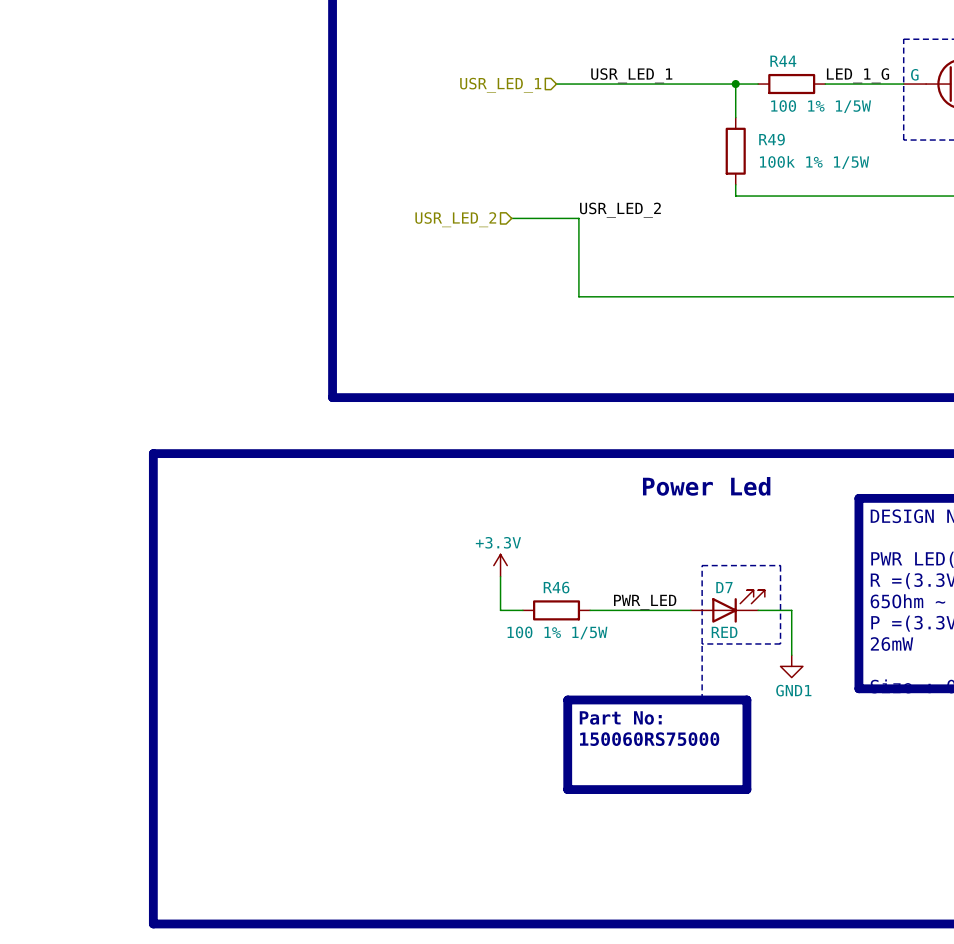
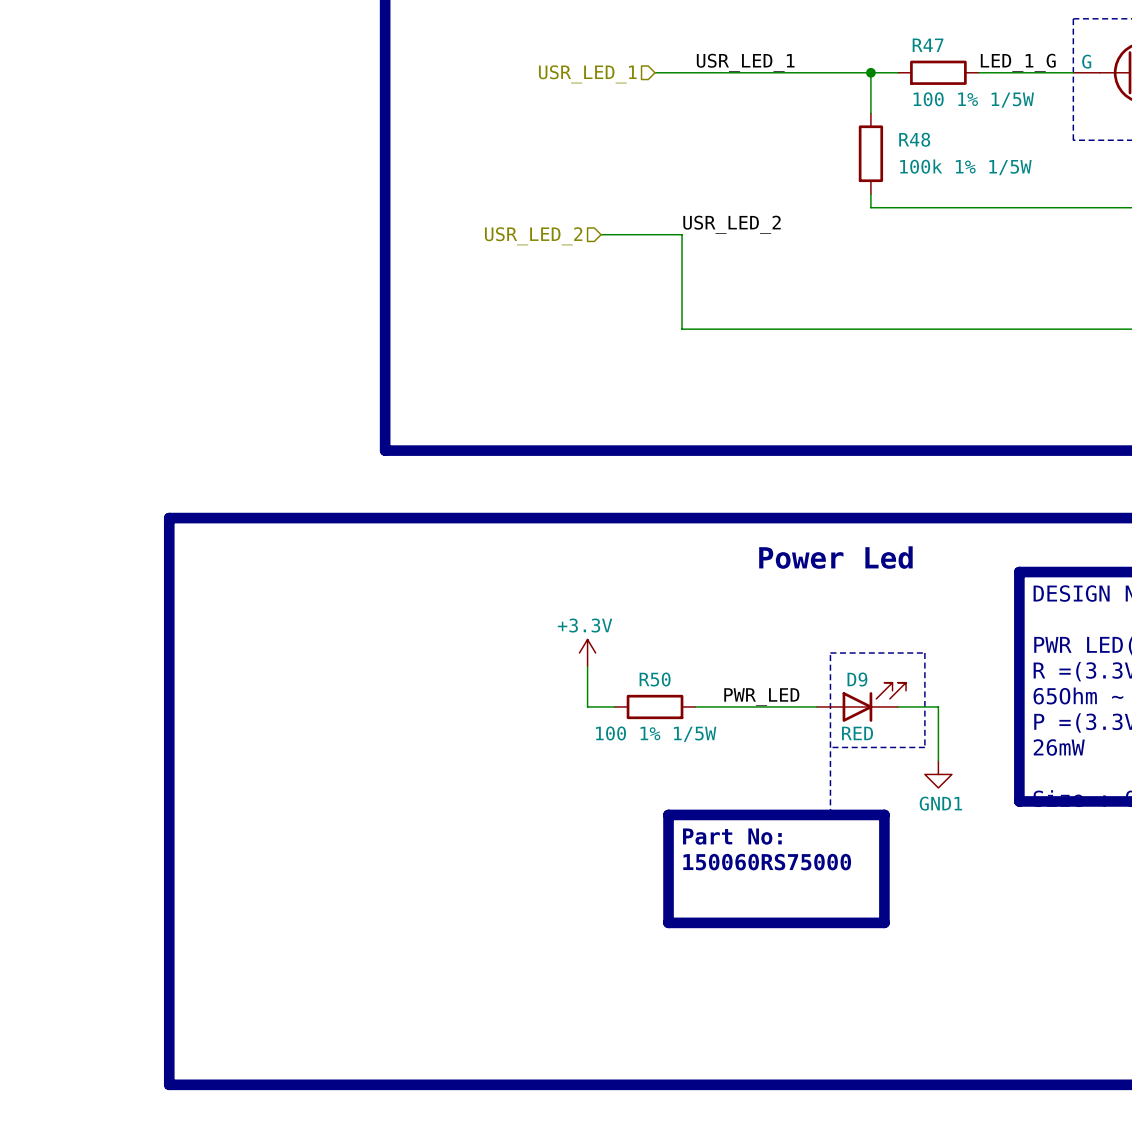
R44 name: R44 (783, 61) -> R47 (928, 45)
R49 name: R49 (772, 139) -> R48 (914, 139)
R46 name: R46 (556, 587) -> R50 (655, 679)
D7 name: D7 (724, 587) -> D9 (857, 679)

